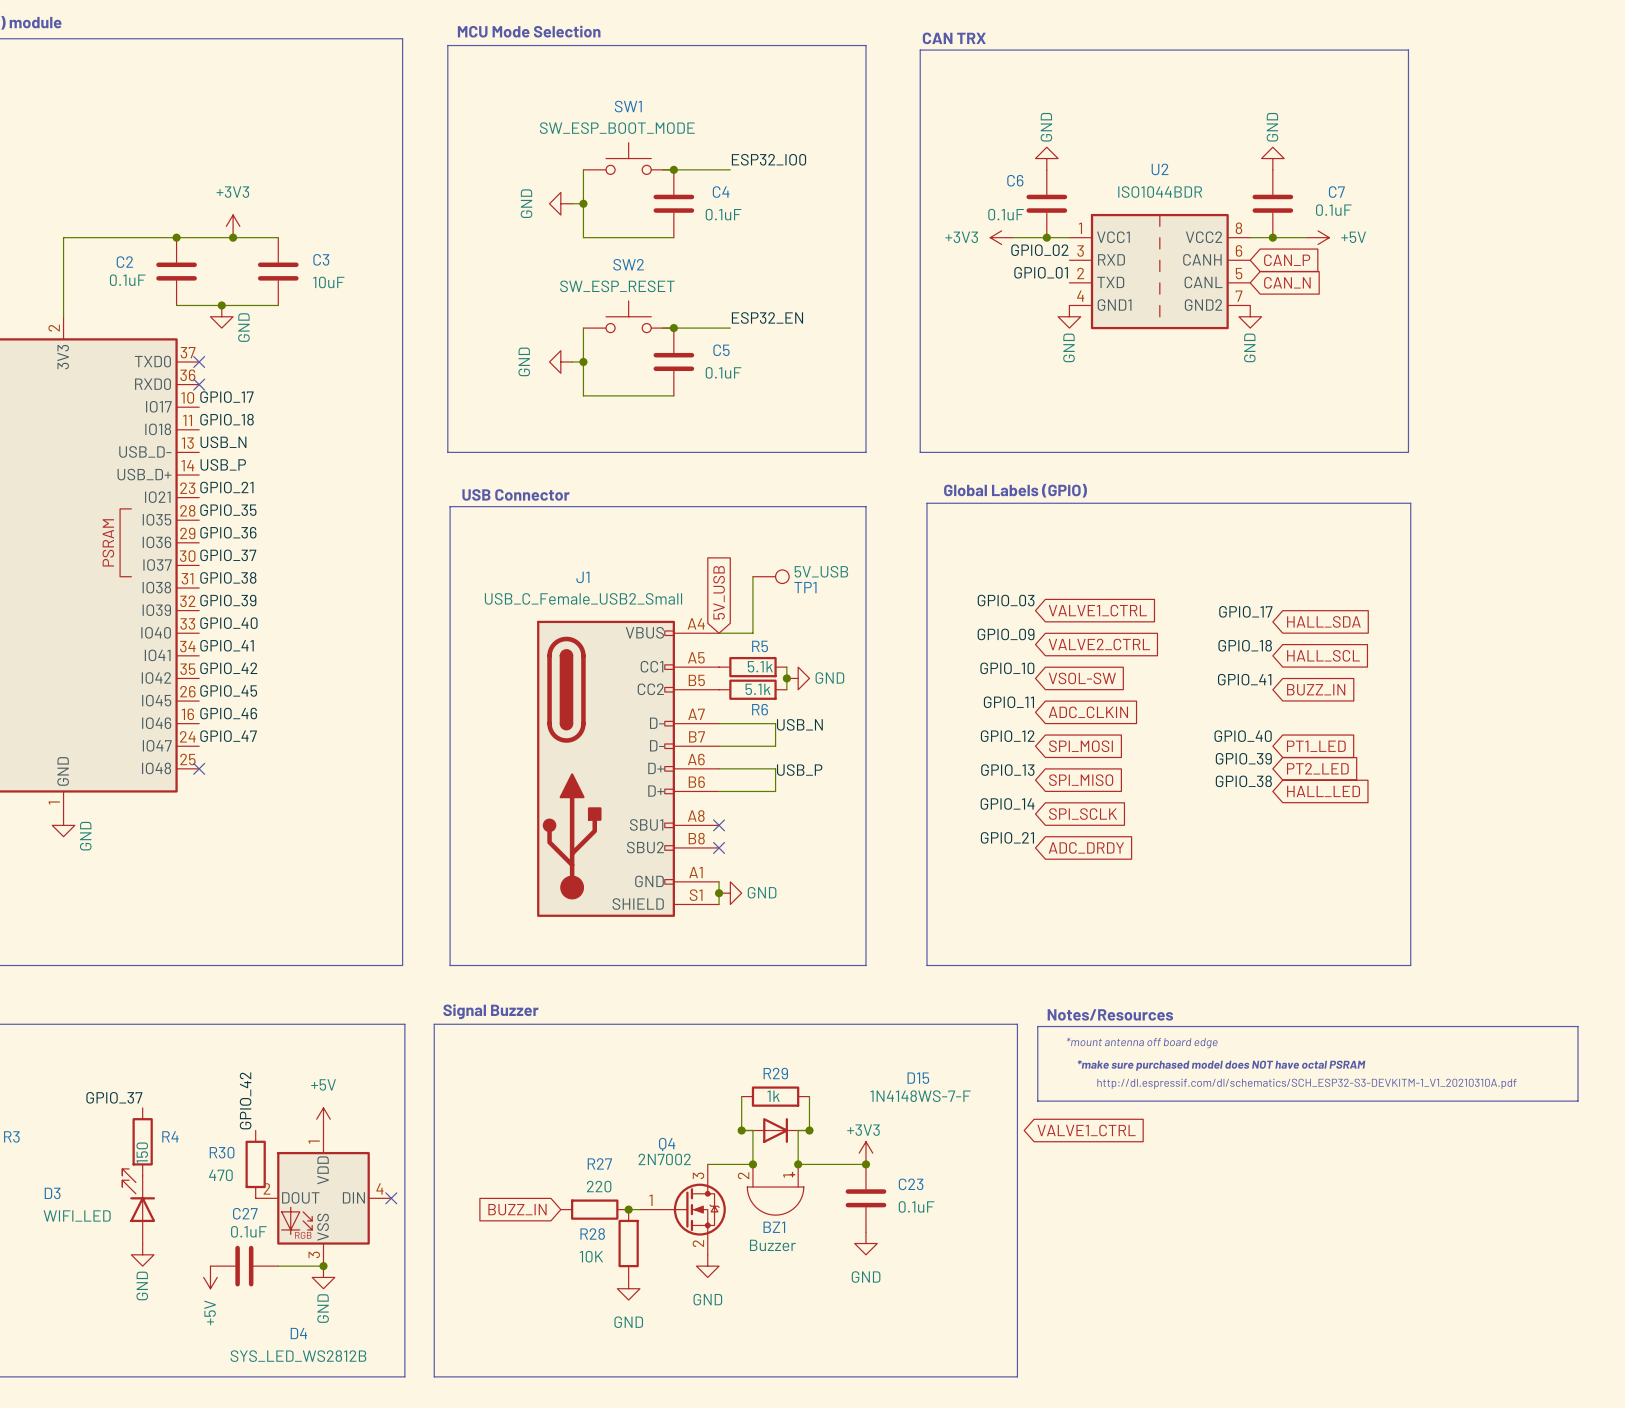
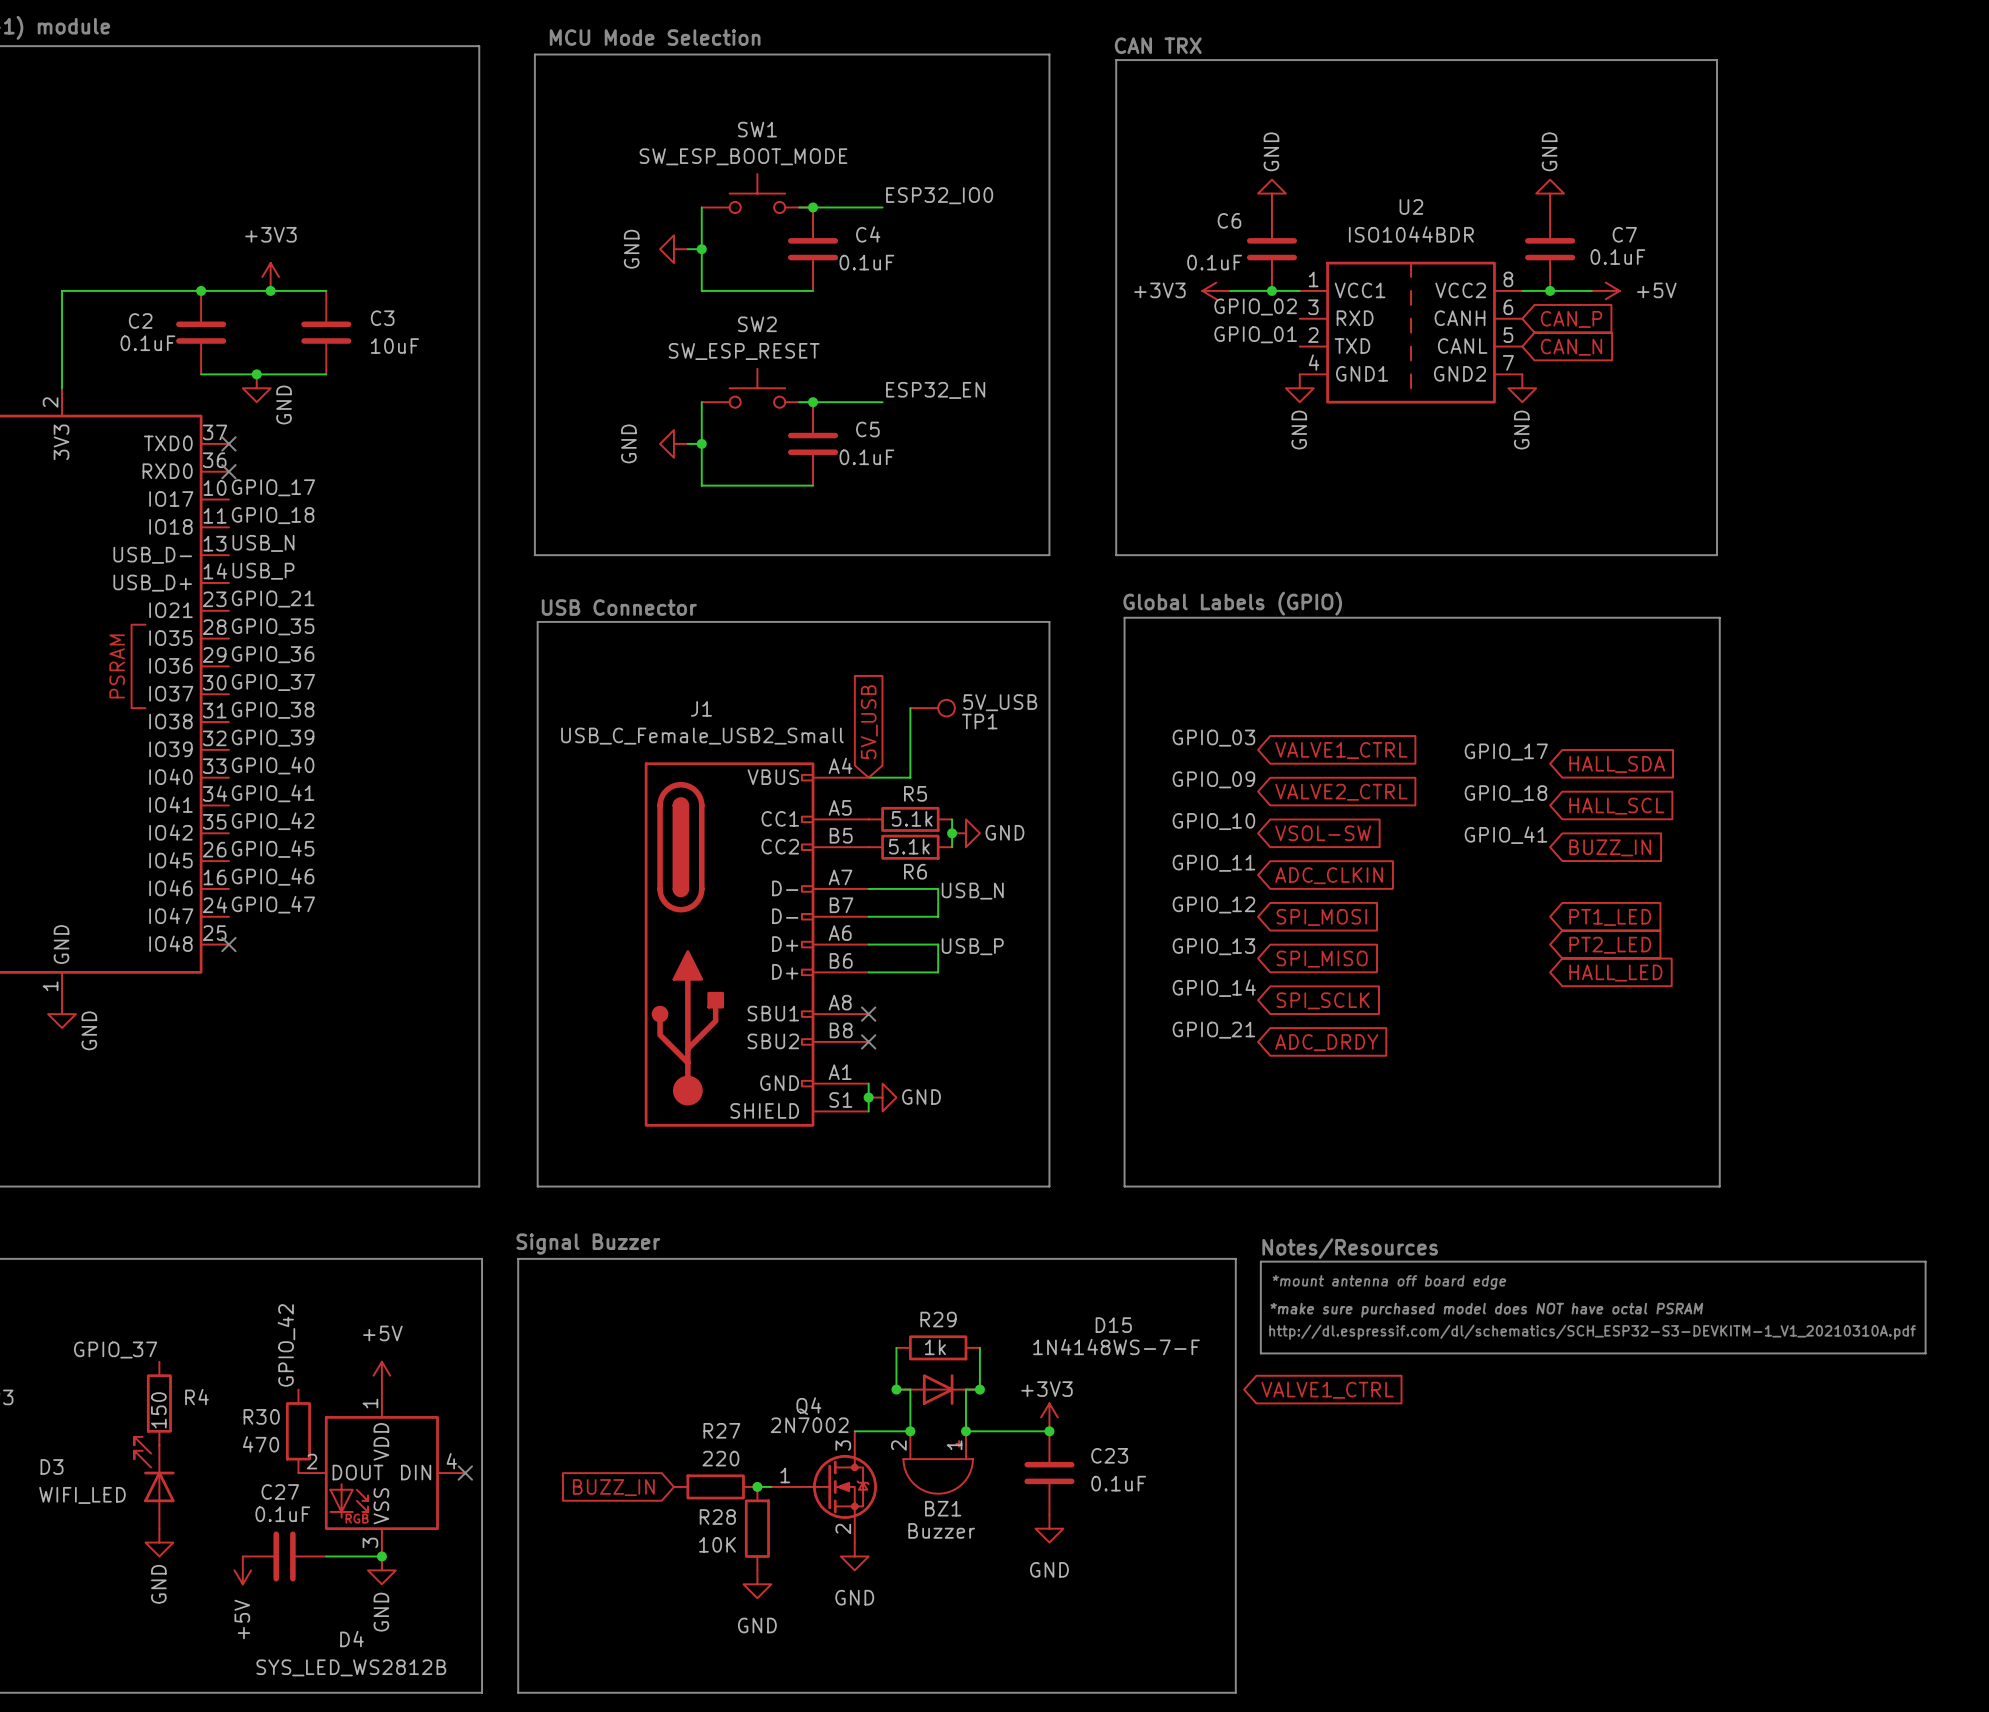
label: GPIO_40 (1243, 736) -> none
label: GPIO_39 (1243, 758) -> none
label: GPIO_38 (1243, 781) -> none

